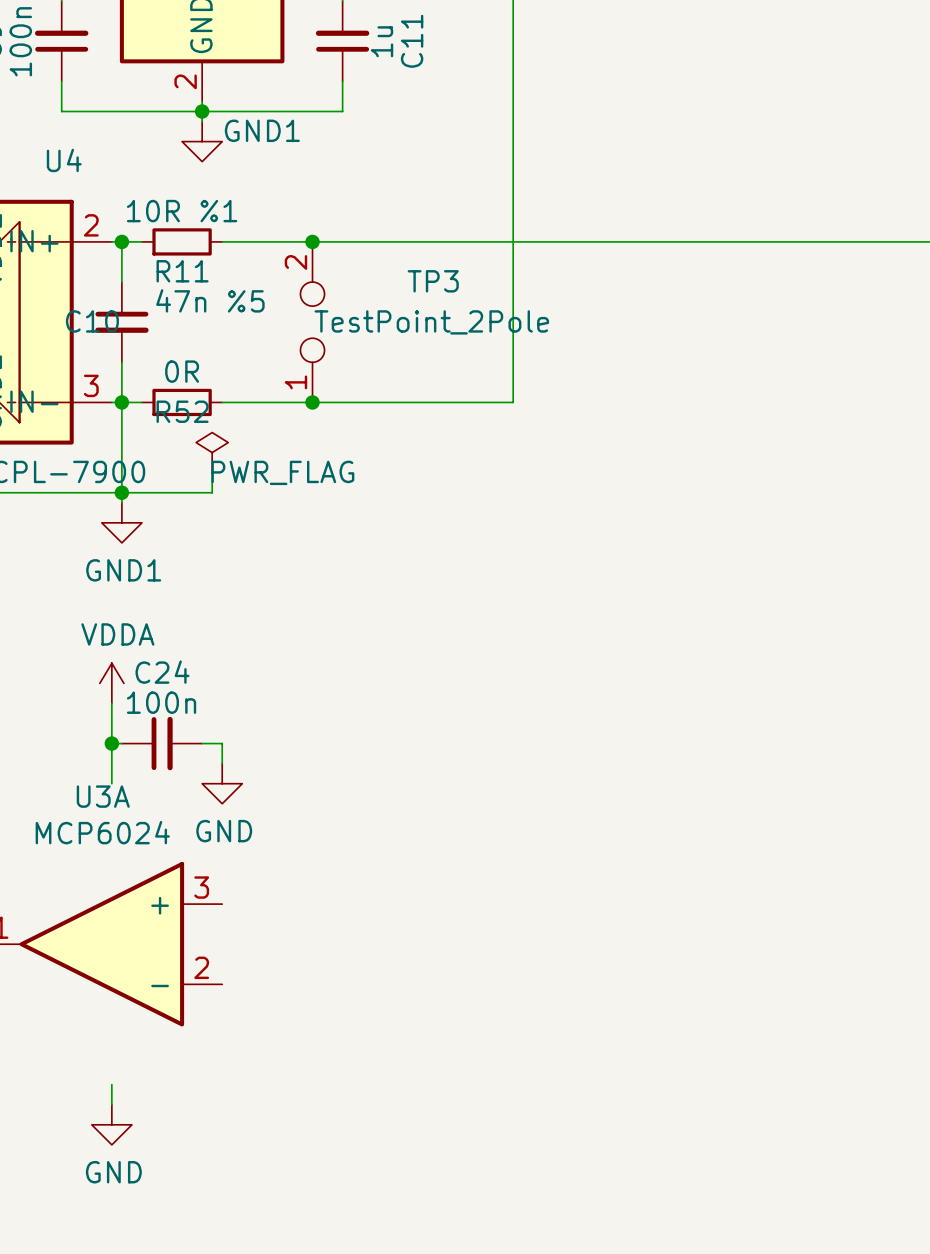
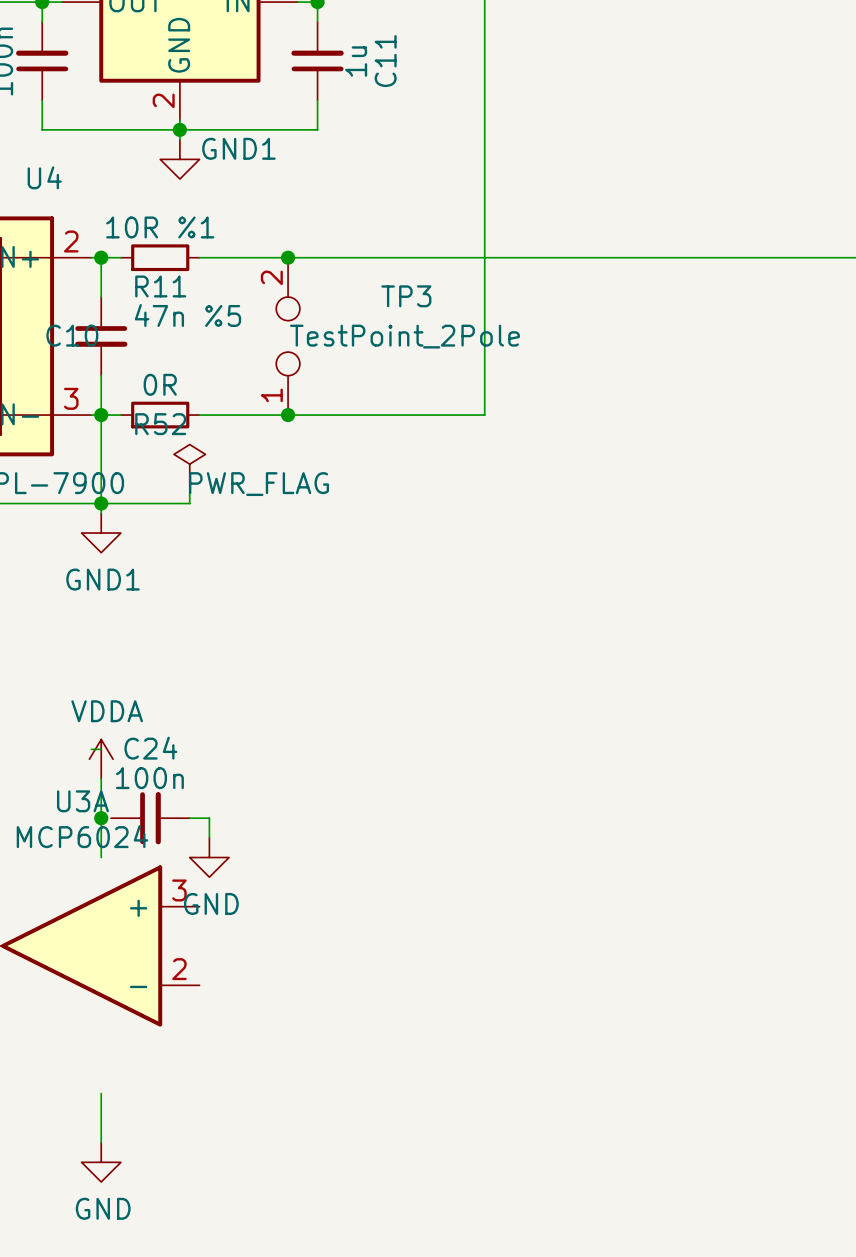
power symbol position: VDDA (111, 683) -> VDDA (101, 759)
wire: (111, 703) (111, 783) -> (101, 778) (101, 857)
junction position: (111, 743) -> (101, 818)
C24 position: (162, 743) -> (150, 818)
wire: (202, 743) (222, 743) (222, 763) -> (189, 818) (209, 818) (209, 837)
power symbol position: GND (222, 783) -> GND (209, 857)
wire: (111, 1084) (111, 1104) -> none
wire: none -> (101, 1093) (101, 1142)
power symbol position: GND (111, 1124) -> GND (101, 1162)

